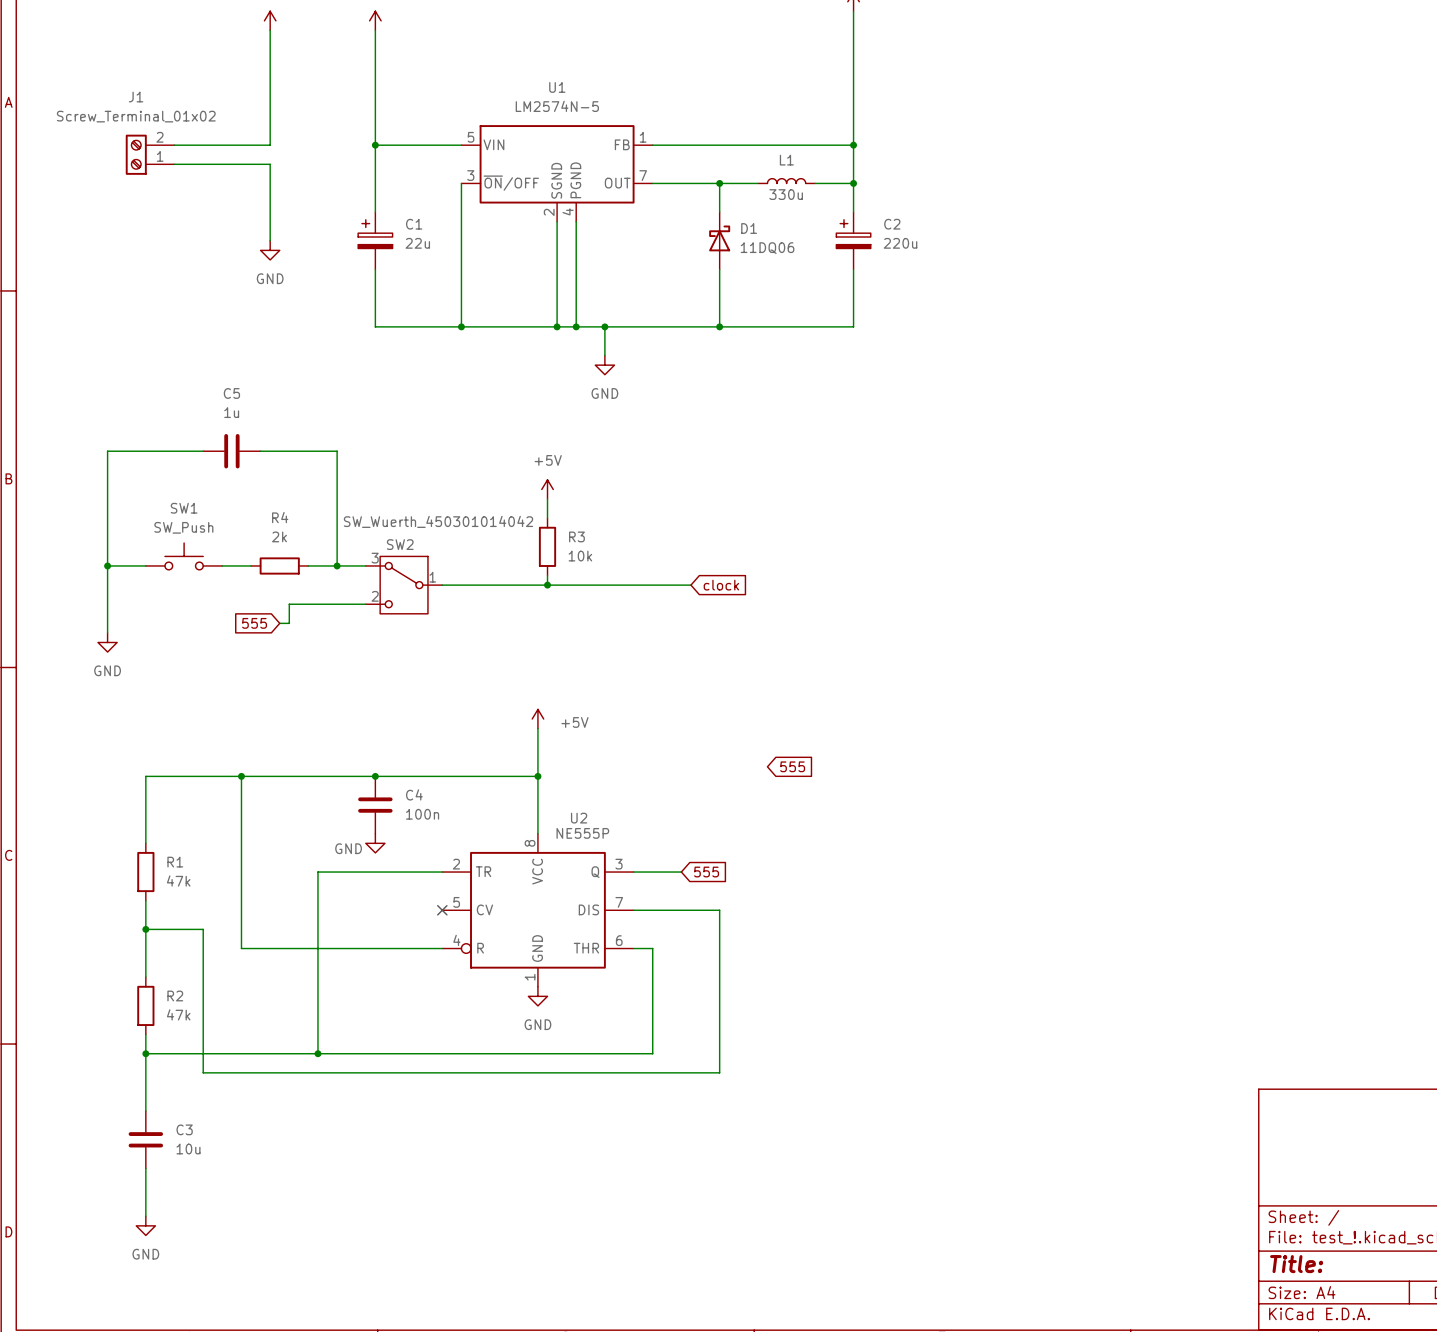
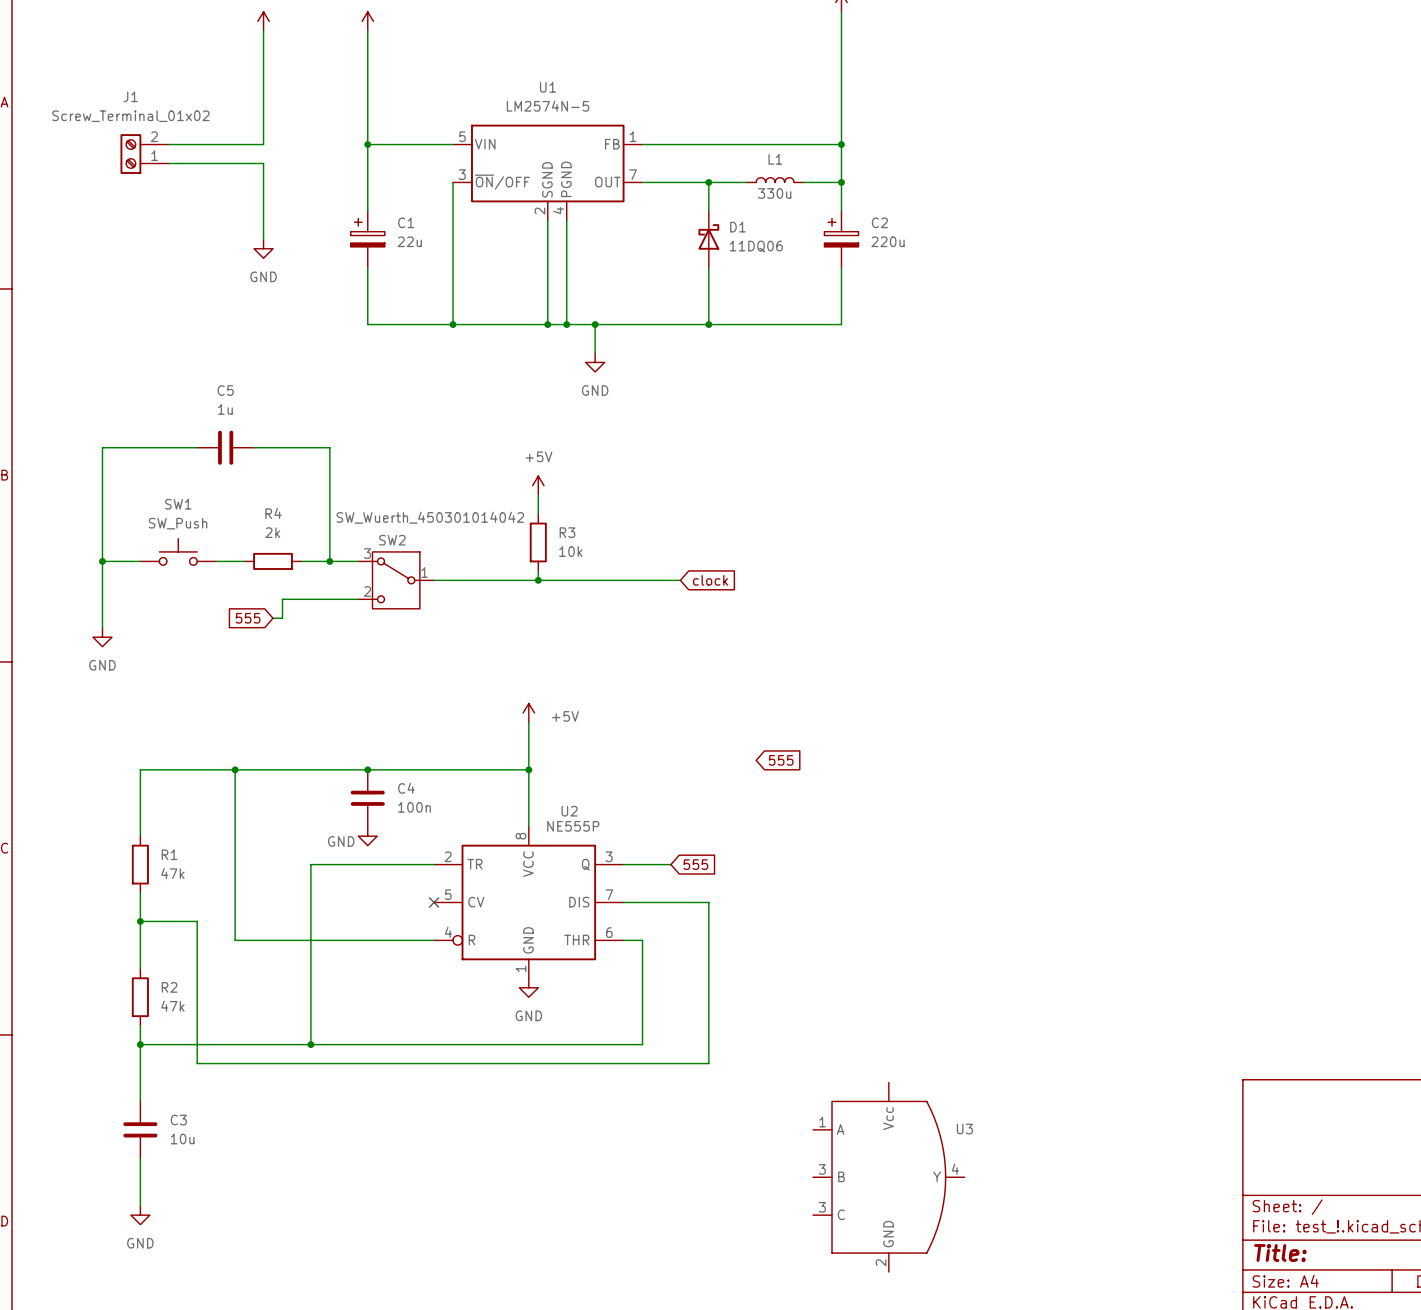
U3: none -> (888, 1177)

